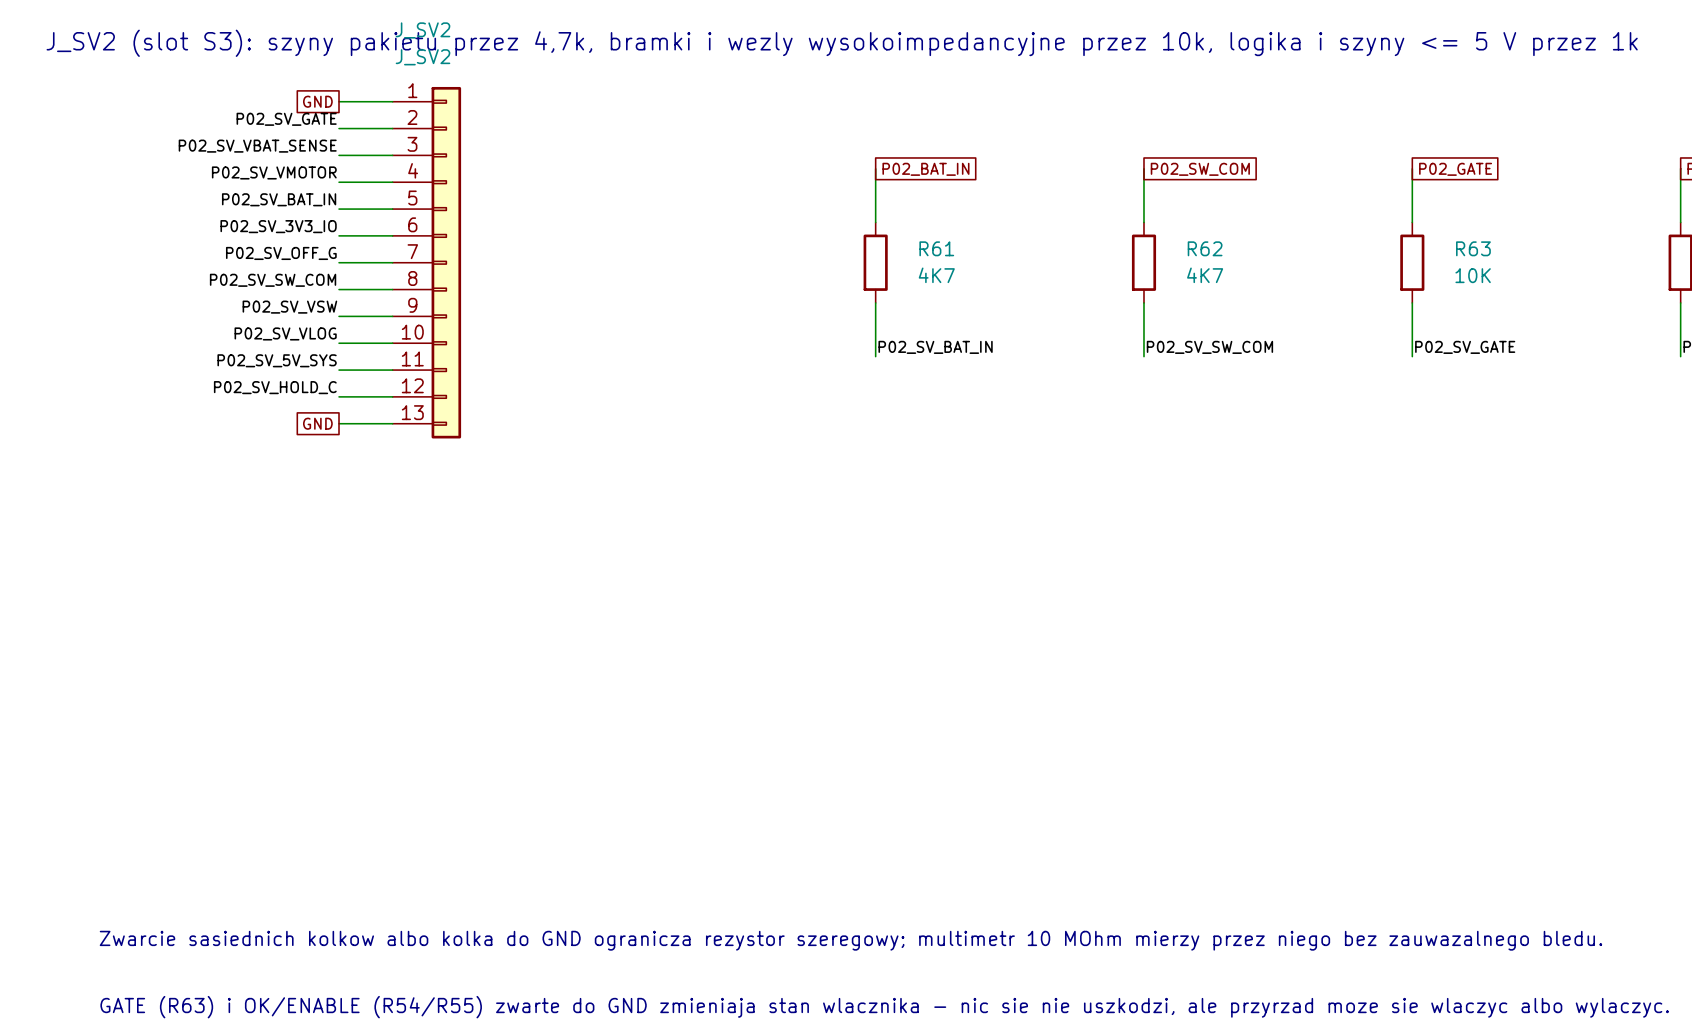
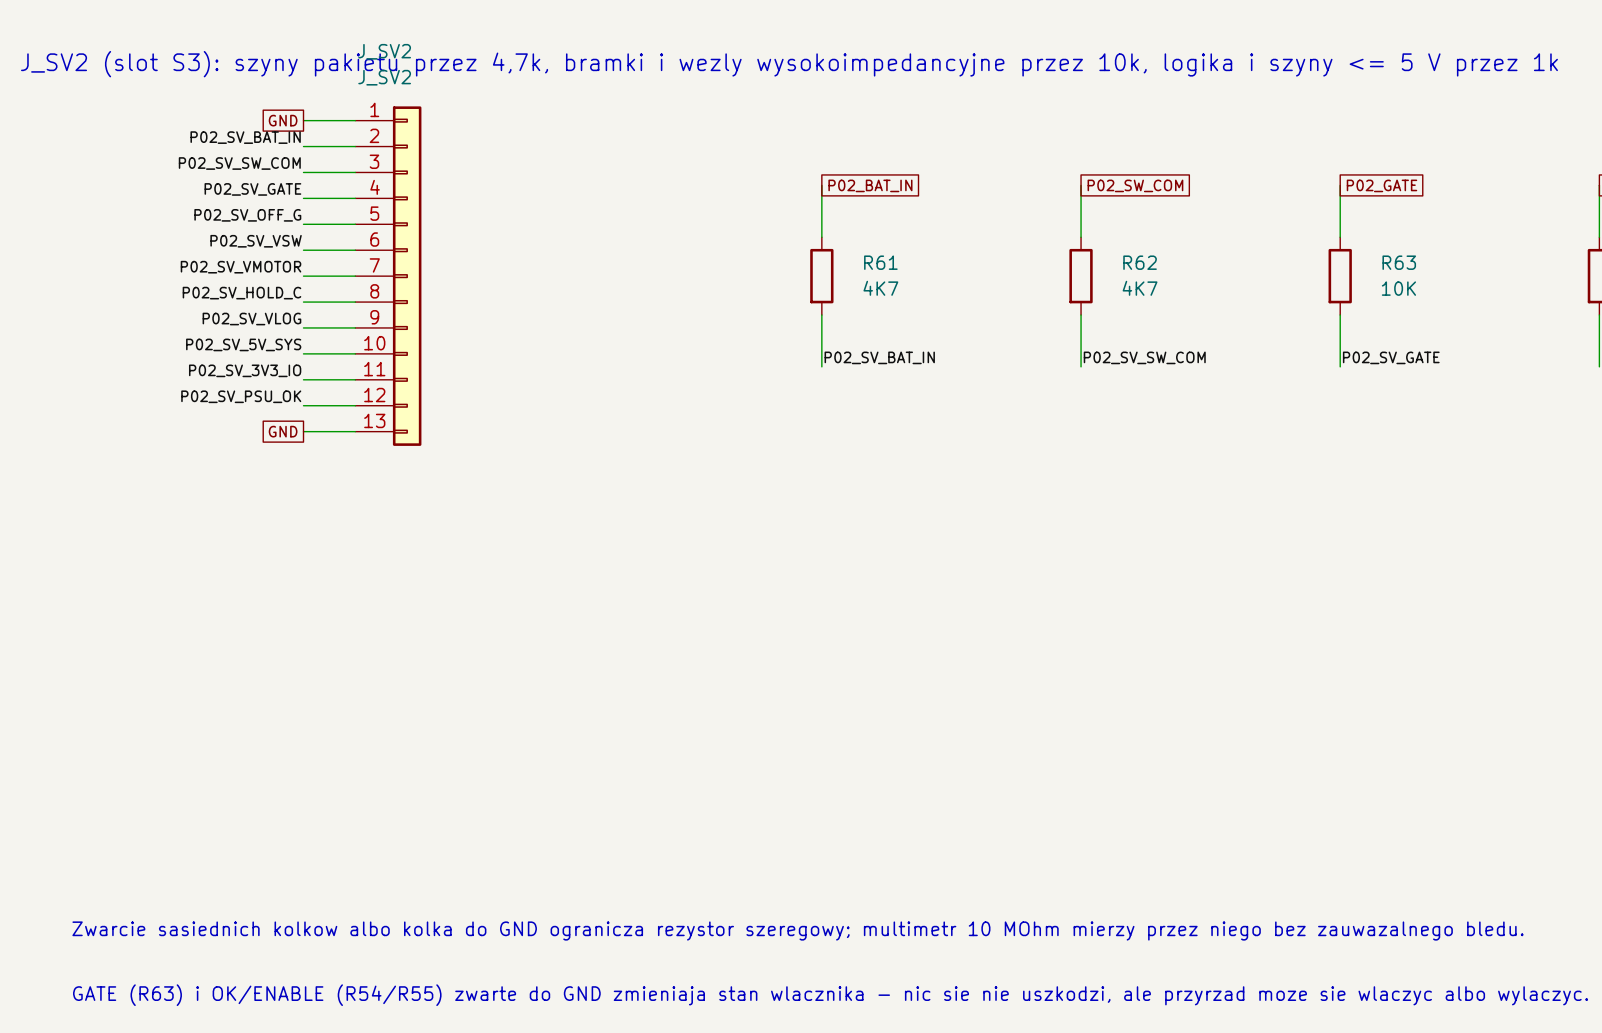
label: P02_SV_GATE (286, 119) -> P02_SV_BAT_IN (245, 137)
label: P02_SV_VBAT_SENSE (257, 146) -> P02_SV_SW_COM (239, 163)
label: P02_SV_VMOTOR (274, 172) -> P02_SV_GATE (252, 189)
label: P02_SV_BAT_IN (279, 199) -> P02_SV_OFF_G (247, 215)
label: P02_SV_3V3_IO (278, 226) -> P02_SV_VSW (256, 241)
label: P02_SV_OFF_G (281, 253) -> P02_SV_VMOTOR (241, 267)
label: P02_SV_SW_COM (273, 280) -> P02_SV_HOLD_C (241, 293)
label: P02_SV_VSW (289, 307) -> P02_SV_VLOG (251, 319)
label: P02_SV_VLOG (285, 333) -> P02_SV_5V_SYS (243, 344)
label: P02_SV_5V_SYS (277, 360) -> P02_SV_3V3_IO (245, 370)
label: P02_SV_HOLD_C (275, 387) -> P02_SV_PSU_OK (241, 396)

